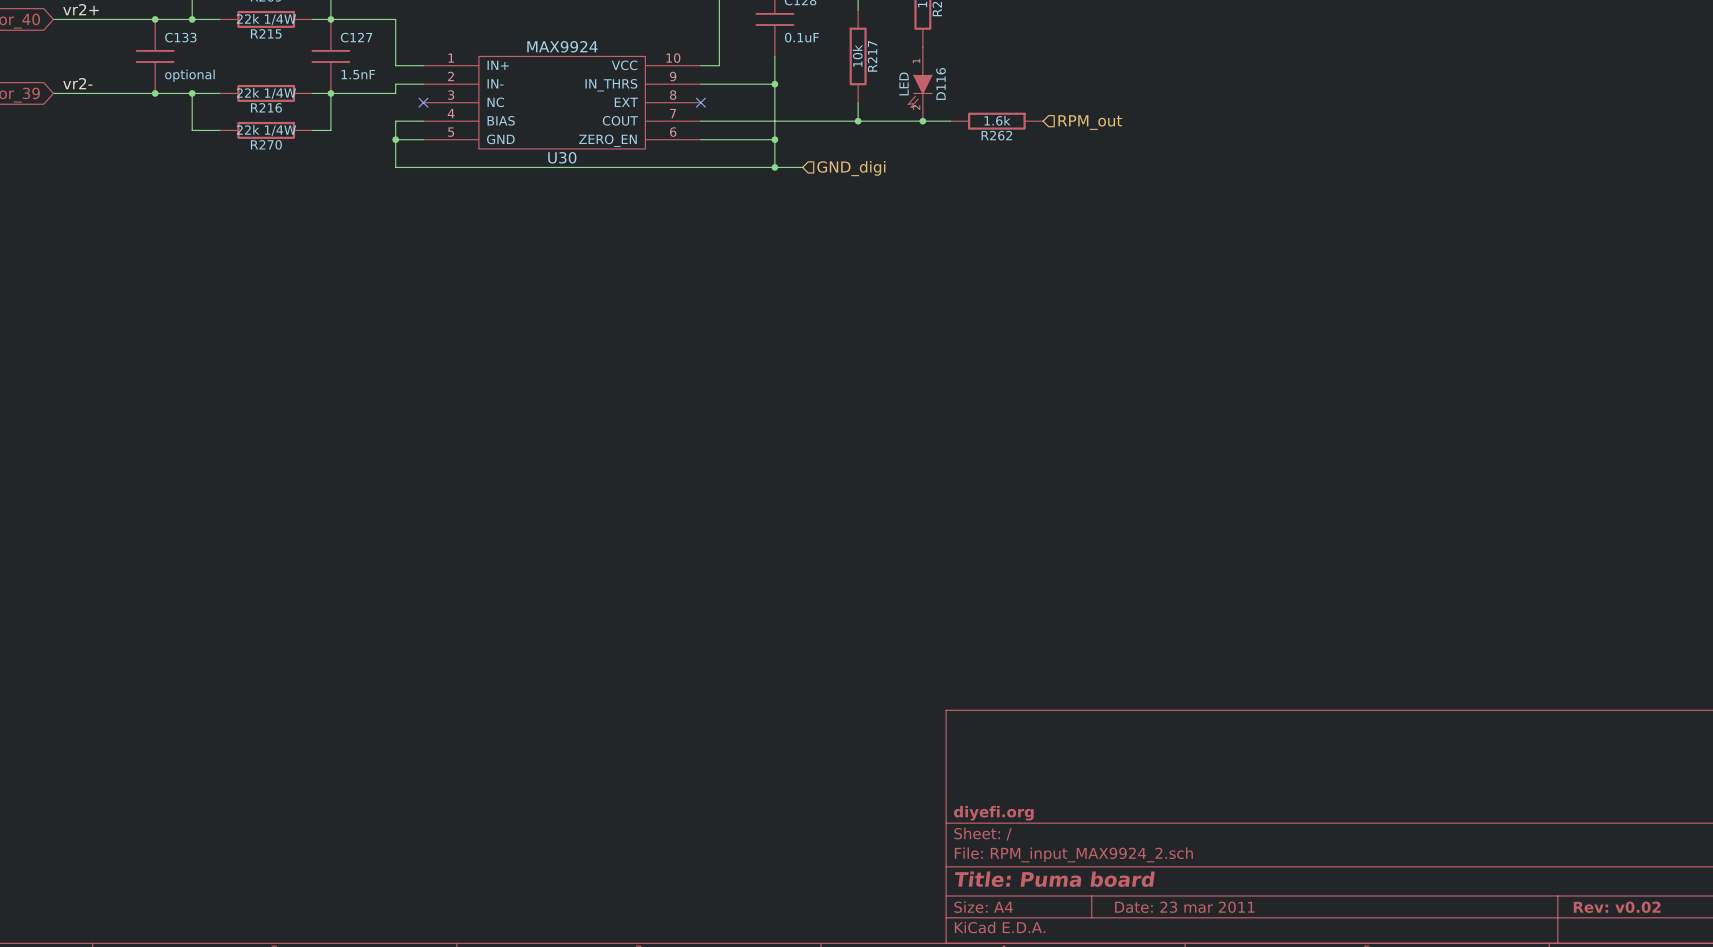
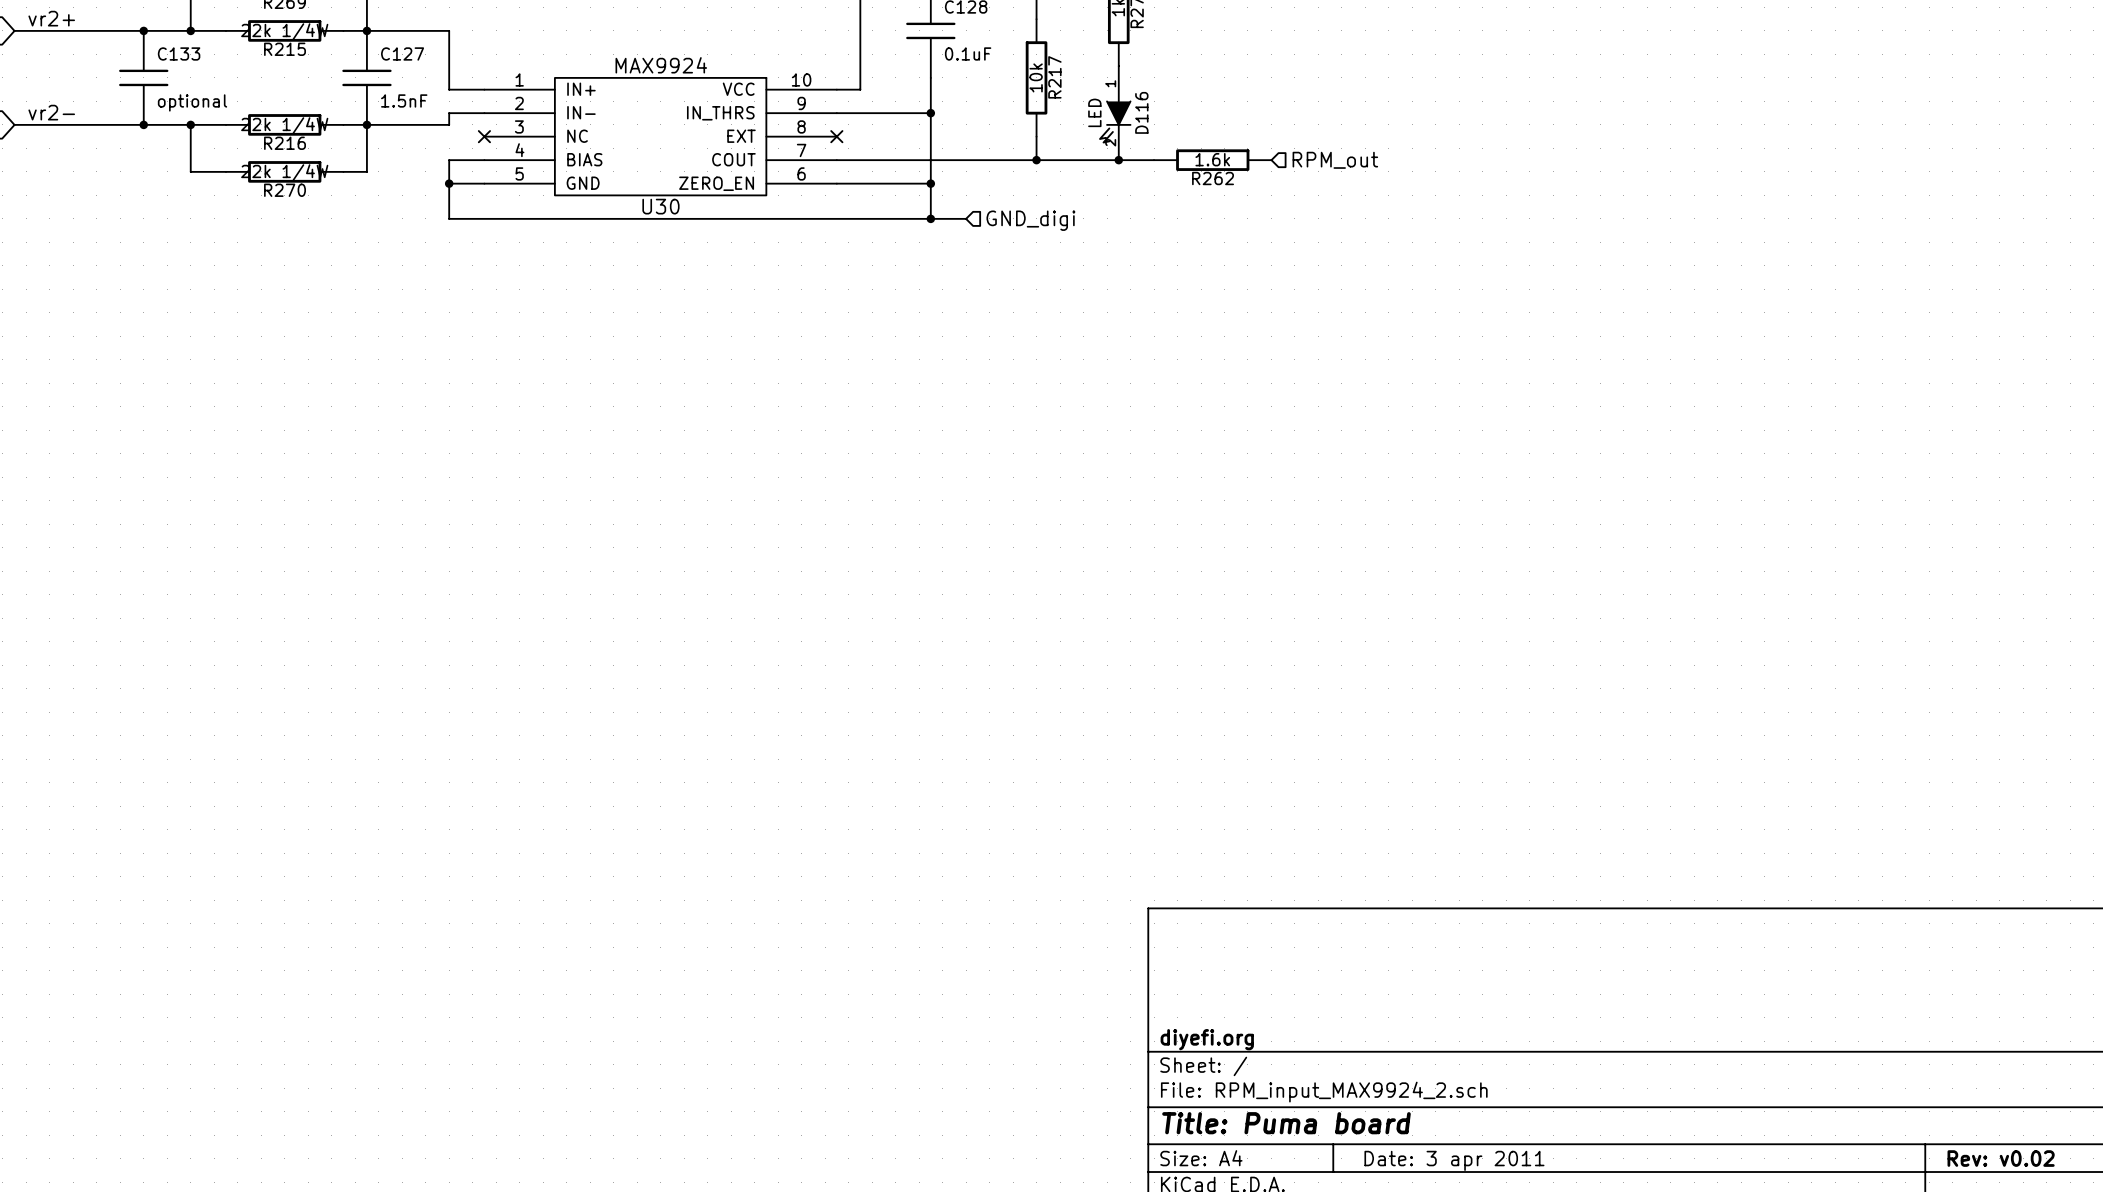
title block: Date: 23 mar 2011 (1184, 907) -> Date: 3 apr 2011 (1454, 1160)

